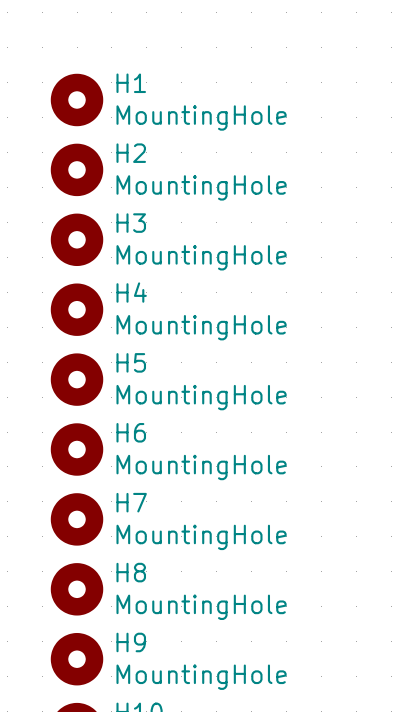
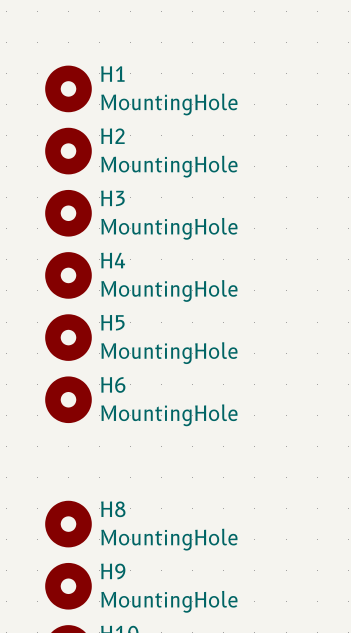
H7: MountingHole (77, 519) -> none

